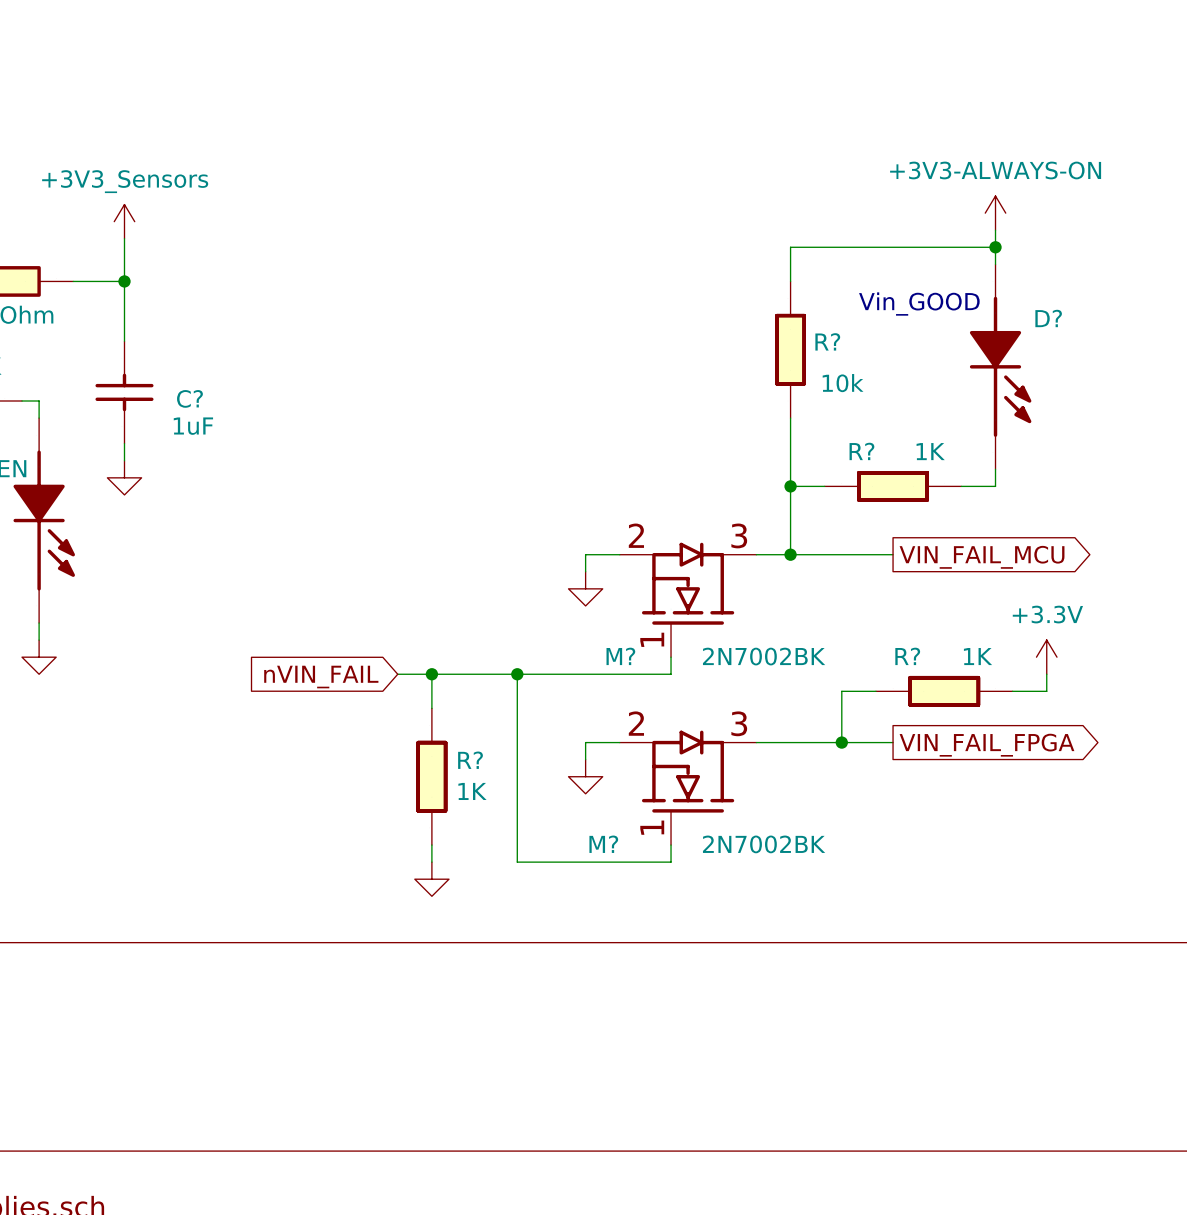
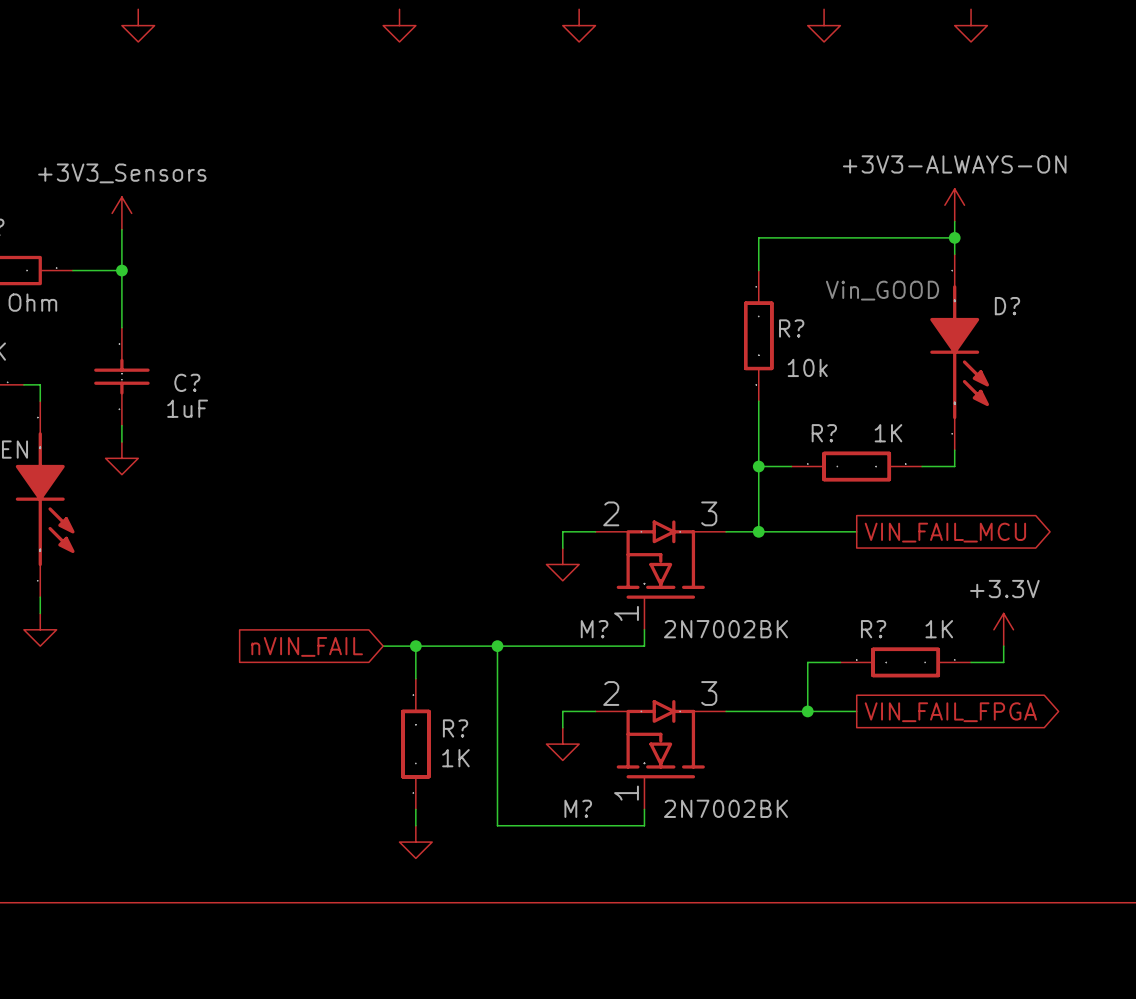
power symbol: none -> (138, 25)
power symbol: none -> (399, 25)
power symbol: none -> (579, 25)
power symbol: none -> (824, 25)
power symbol: none -> (971, 25)

